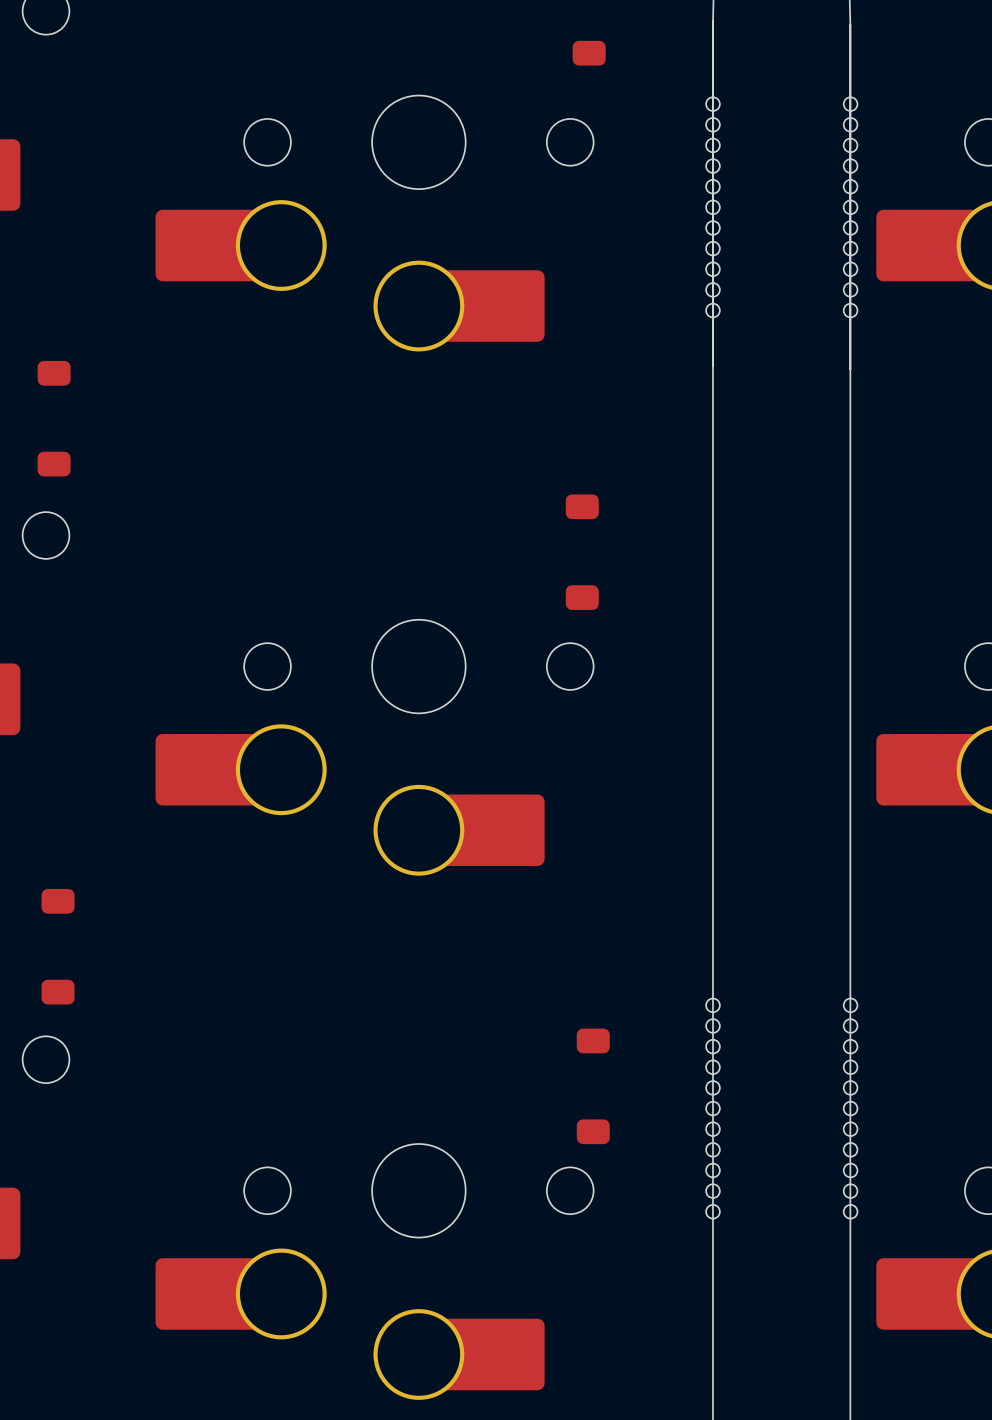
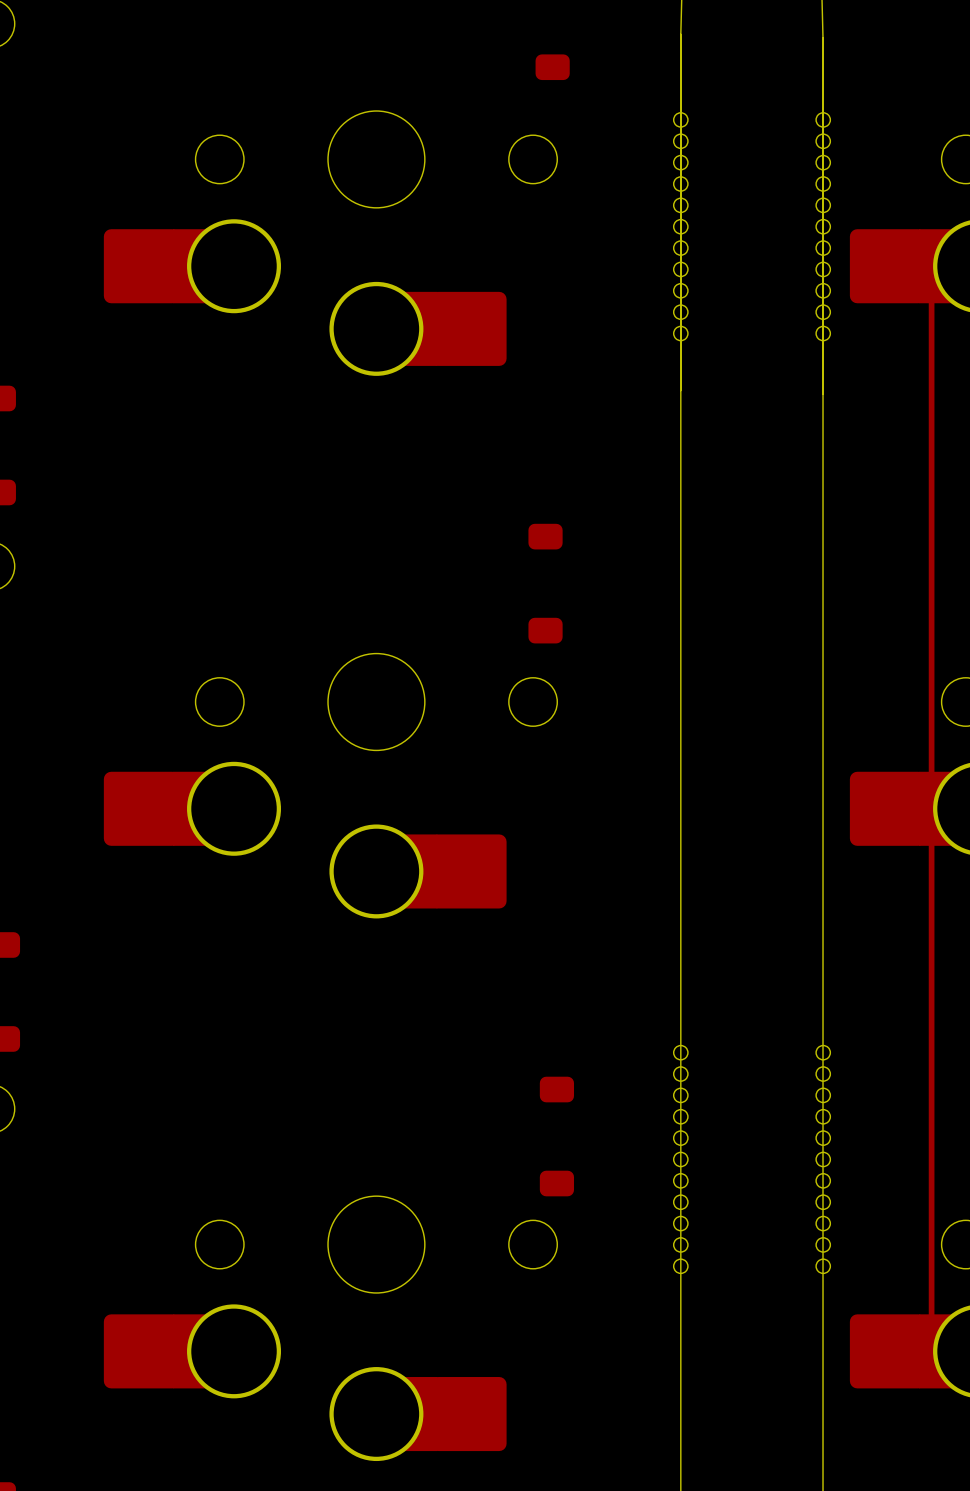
top track: none -> (935, 266) (931, 270) (931, 804) (935, 808) (931, 813) (931, 1347) (935, 1351)

